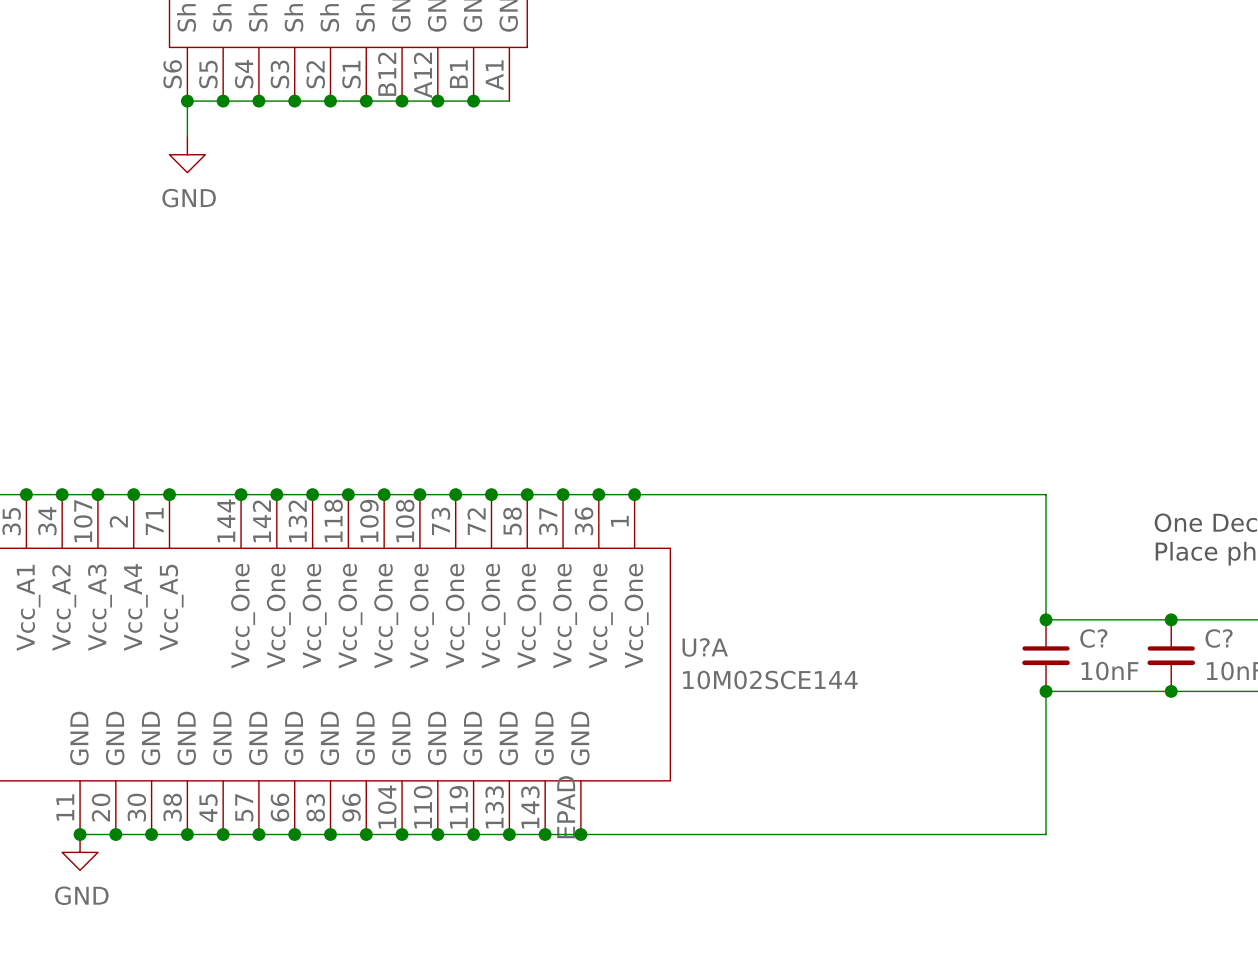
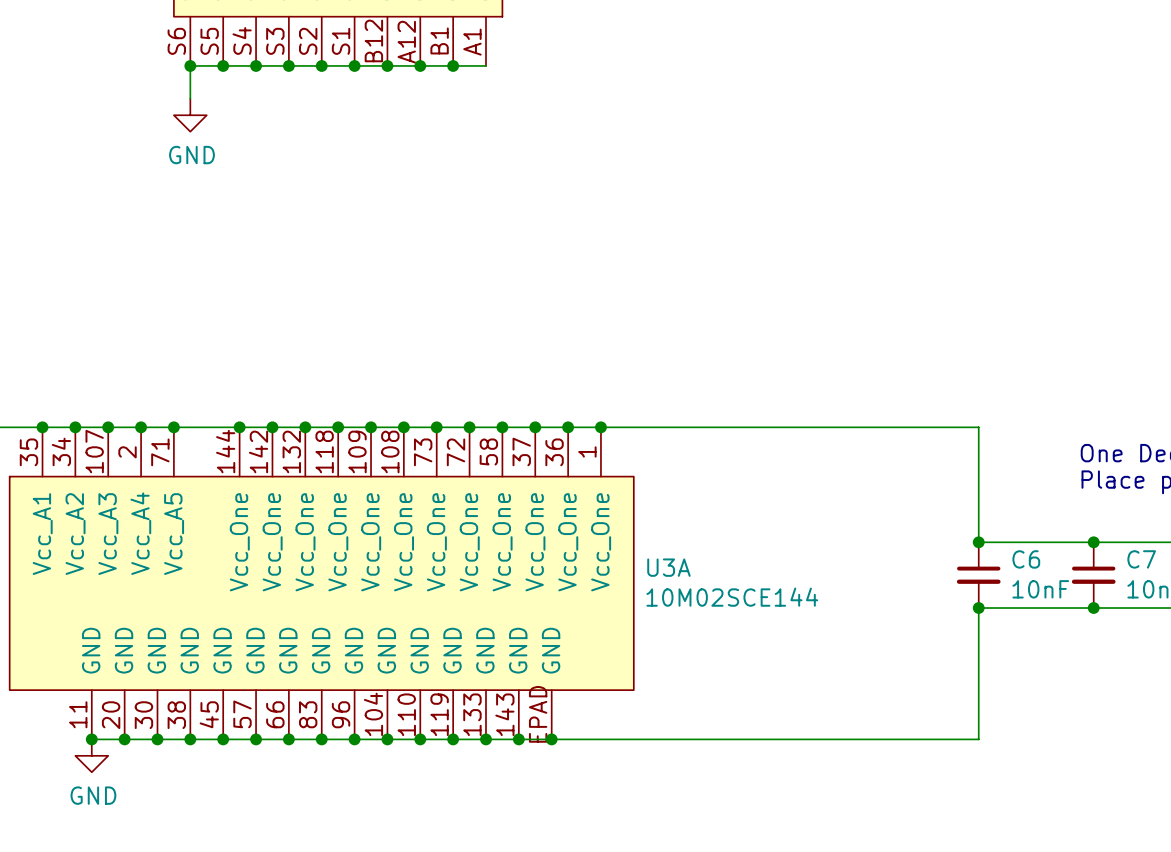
C? name: C? (1093, 638) -> C6 (1026, 559)
C? name: C? (1219, 638) -> C7 (1141, 559)
U?A name: U?A (705, 647) -> U3A (668, 567)

